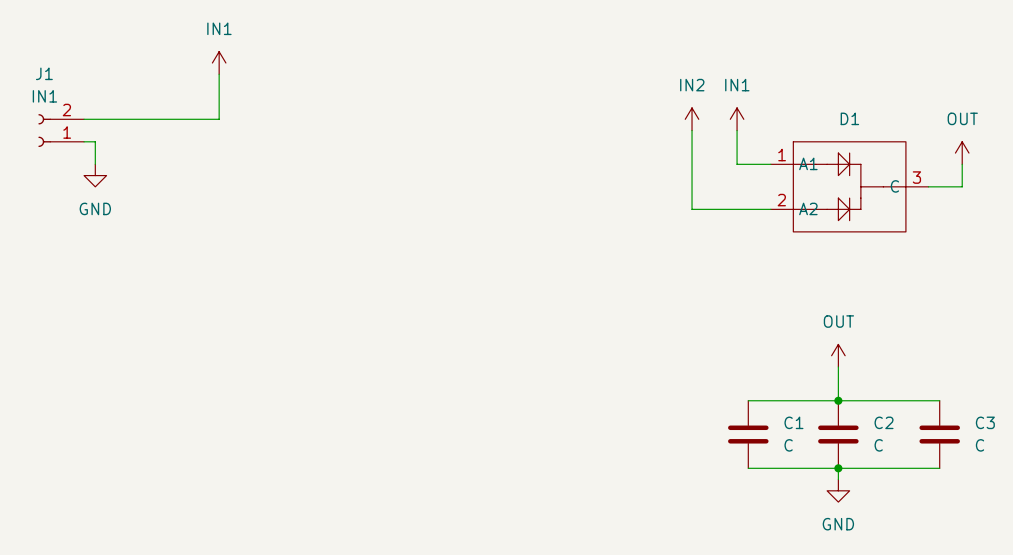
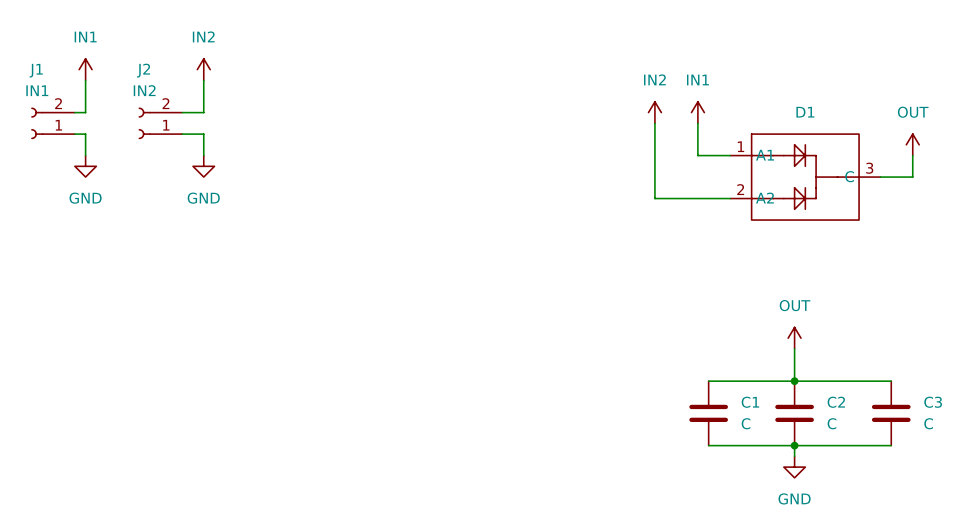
power symbol position: IN1 (219, 63) -> IN1 (85, 69)
power symbol: none -> IN2 (203, 69)
wire: (95, 119) (196, 119) -> (85, 112) (85, 80)
J2: none -> IN2 (160, 123)
wire: none -> (182, 134) (203, 134) (203, 155)
power symbol: none -> GND (203, 166)

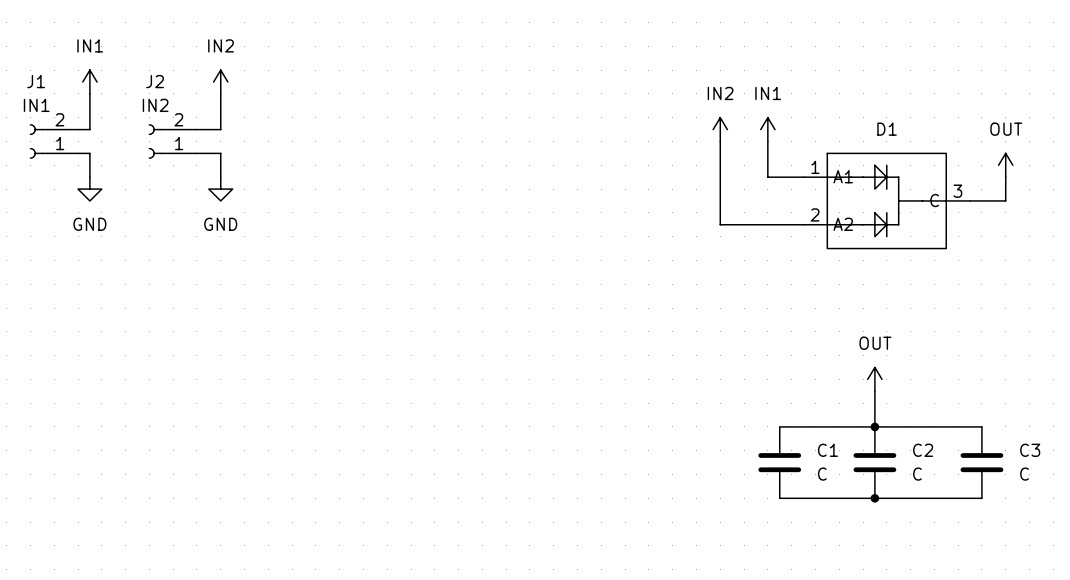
wire: (794, 445) (794, 456) -> none
power symbol: GND (794, 467) -> none

